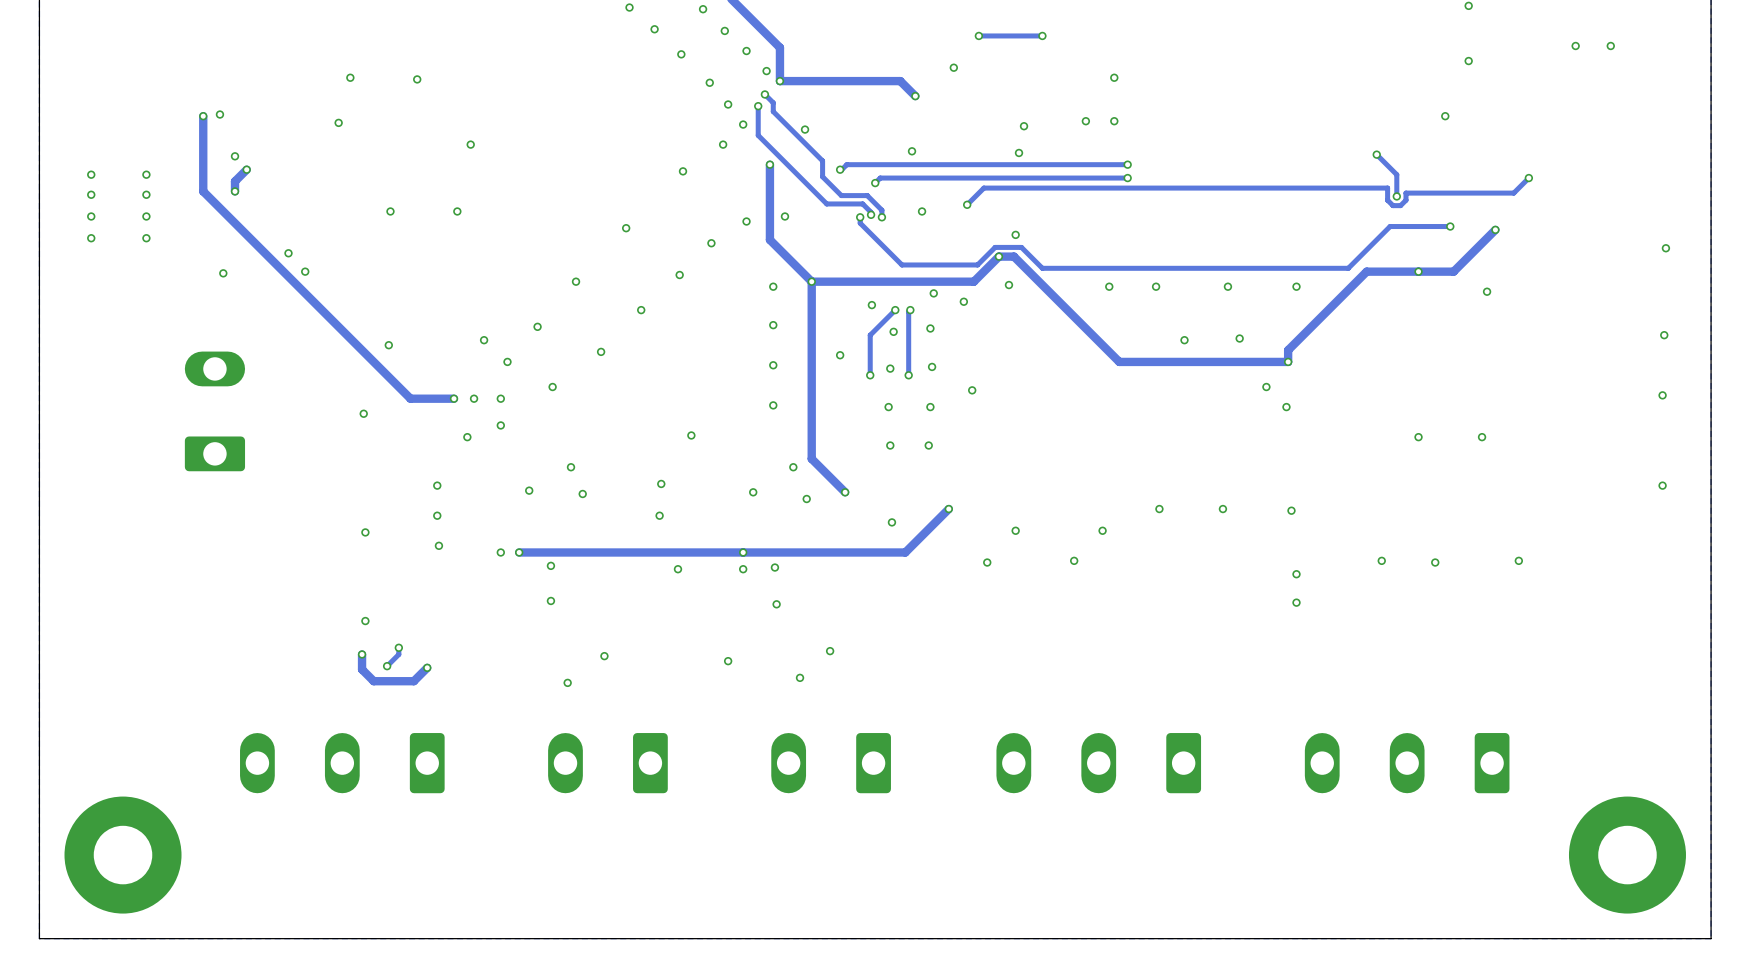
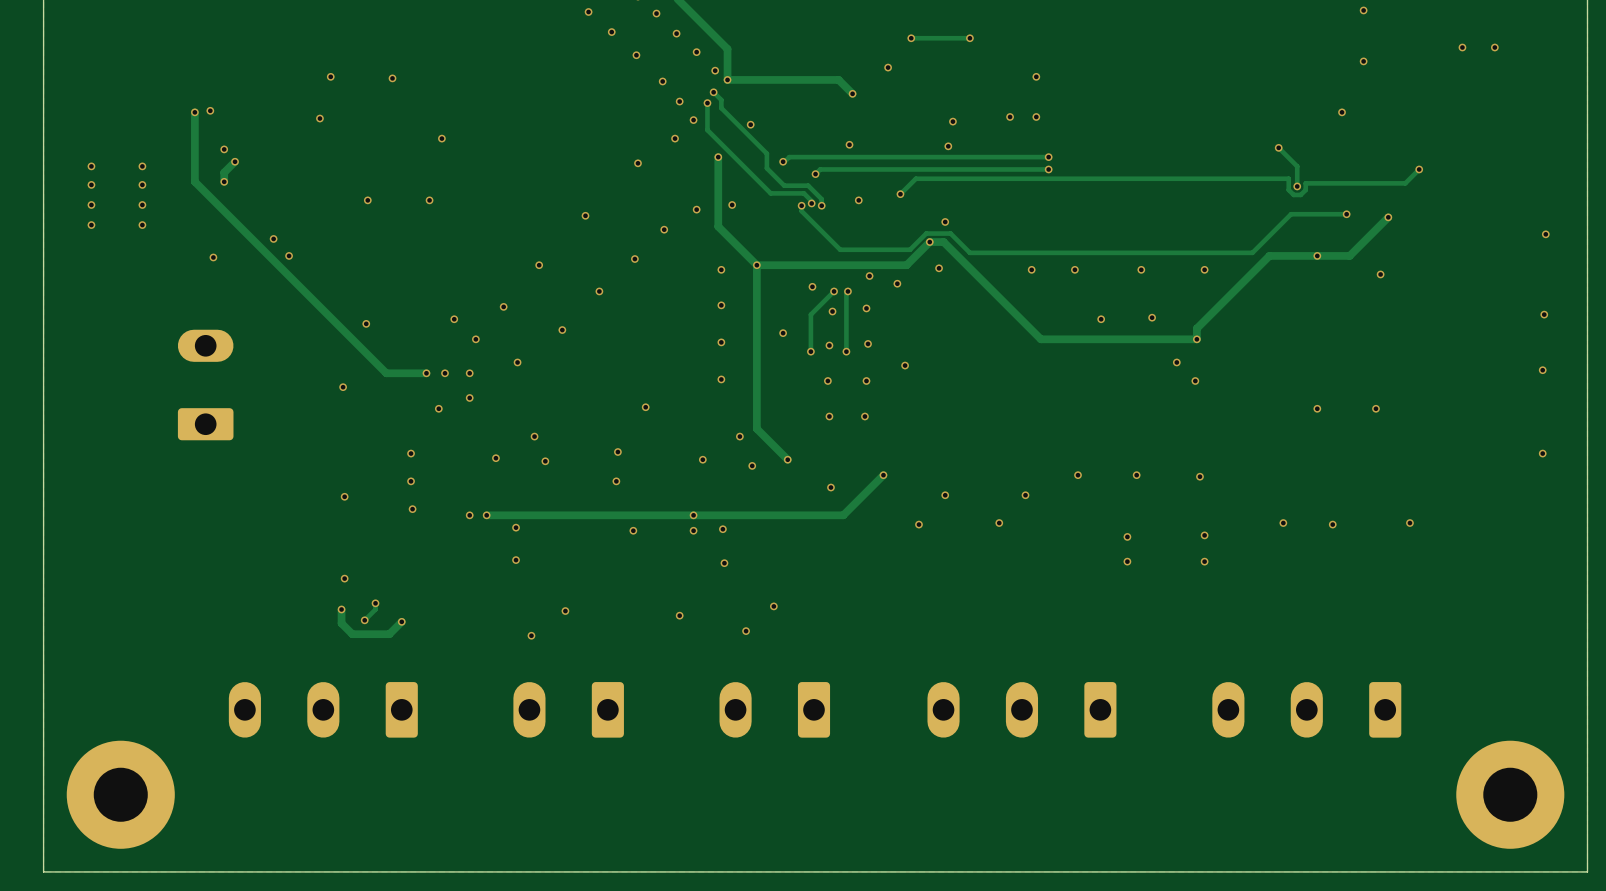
via: none -> (1127, 536)
via: none -> (1127, 561)

